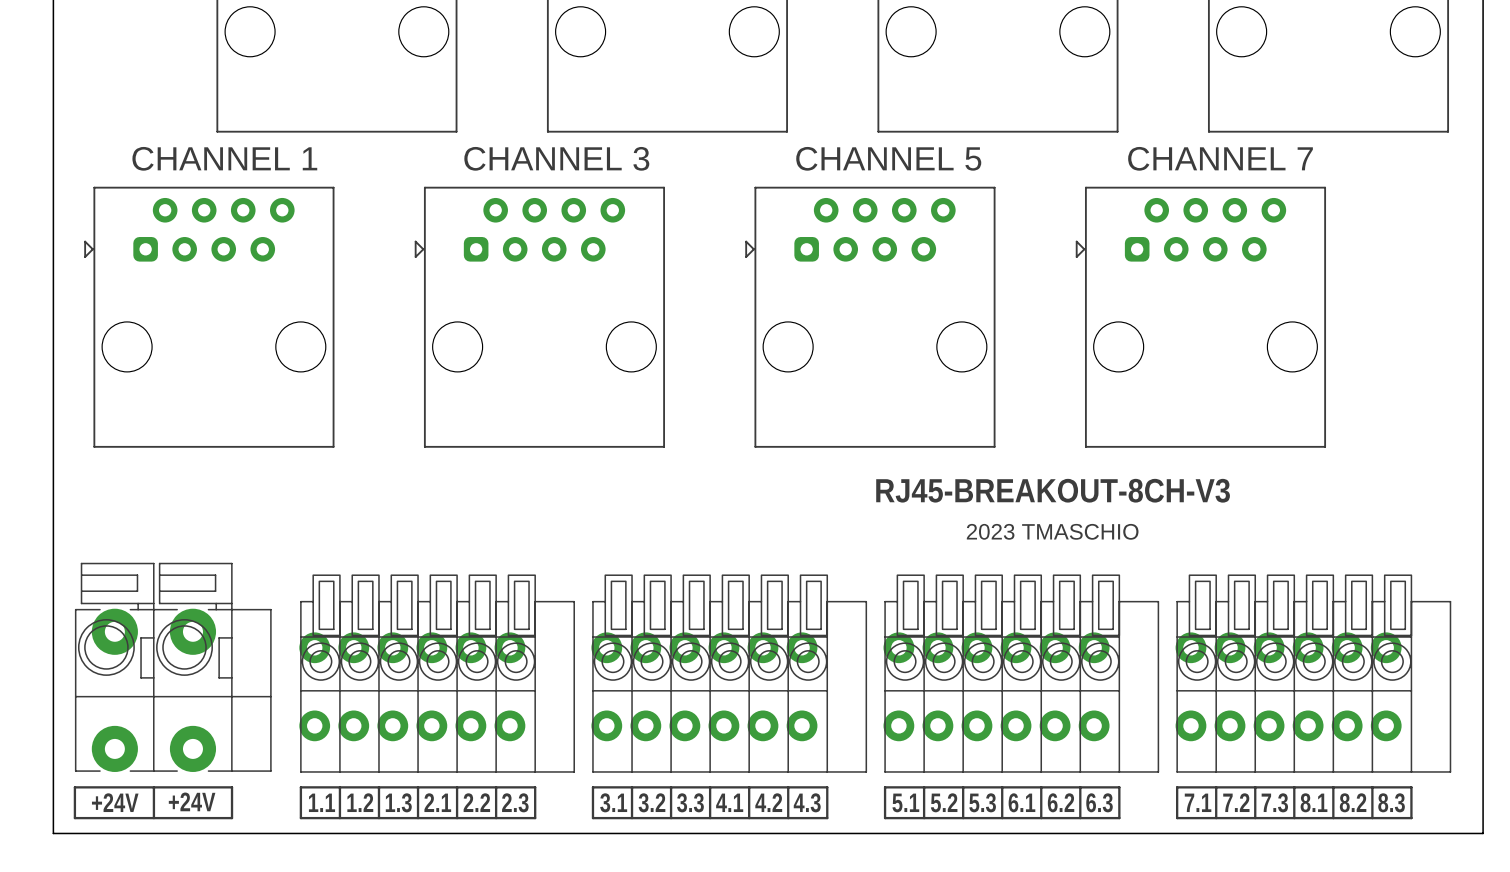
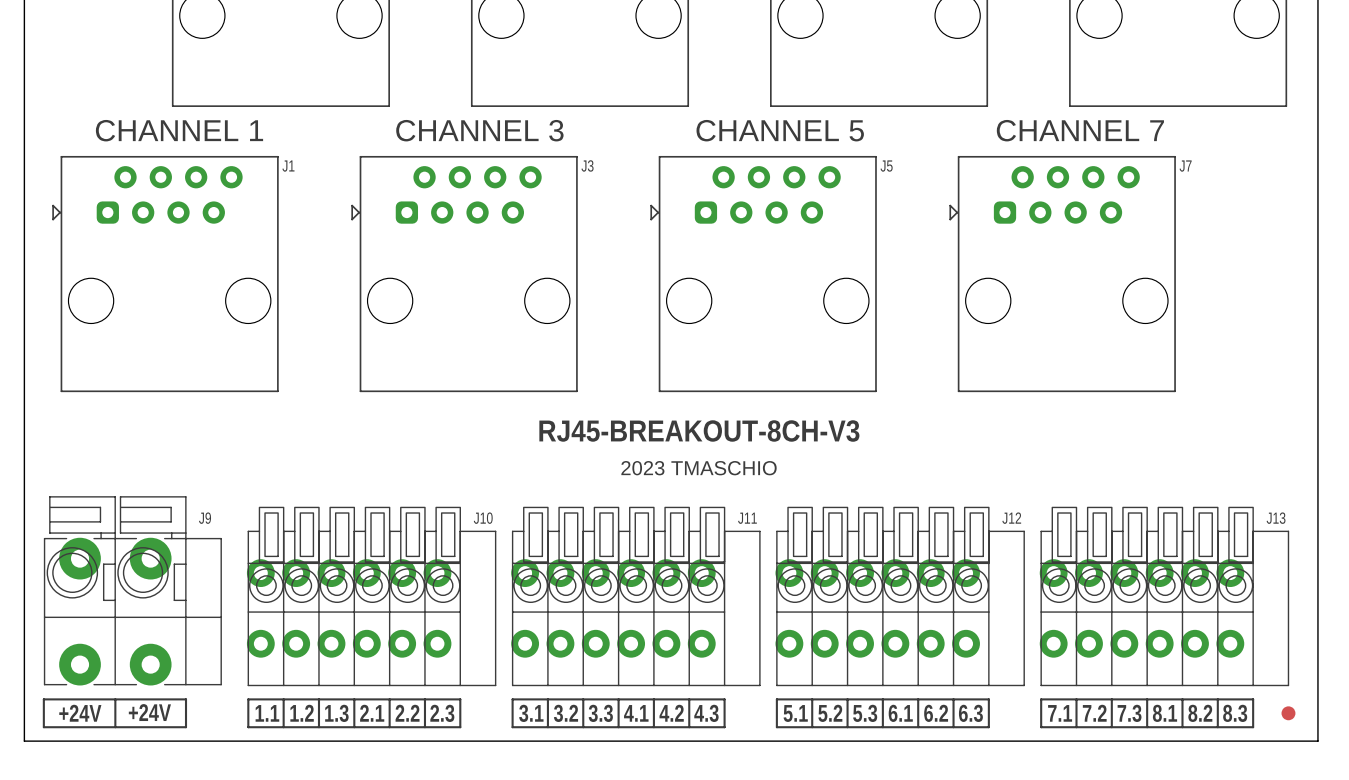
J1 name: none -> J1 (288, 166)
J3 name: none -> J3 (587, 165)
J5 name: none -> J5 (886, 166)
J7 name: none -> J7 (1185, 166)
text position: RJ45-BREAKOUT-8CH-V3 (1053, 490) -> RJ45-BREAKOUT-8CH-V3 (699, 431)
text position: 2023 TMASCHIO (1052, 531) -> 2023 TMASCHIO (699, 468)
J9 name: none -> J9 (205, 518)
J10 name: none -> J10 (483, 518)
J11 name: none -> J11 (747, 518)
J12 name: none -> J12 (1011, 518)
J13 name: none -> J13 (1276, 518)
part: none -> (1288, 713)

